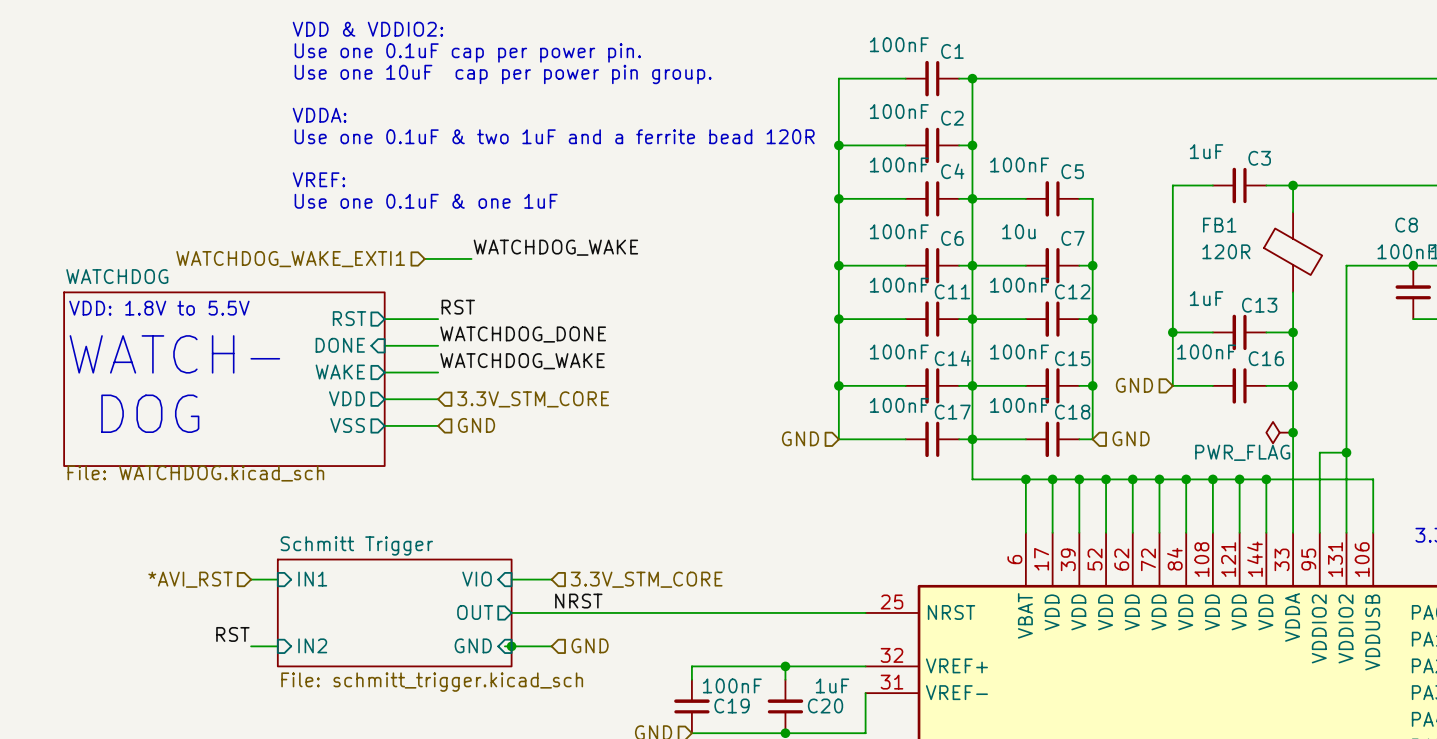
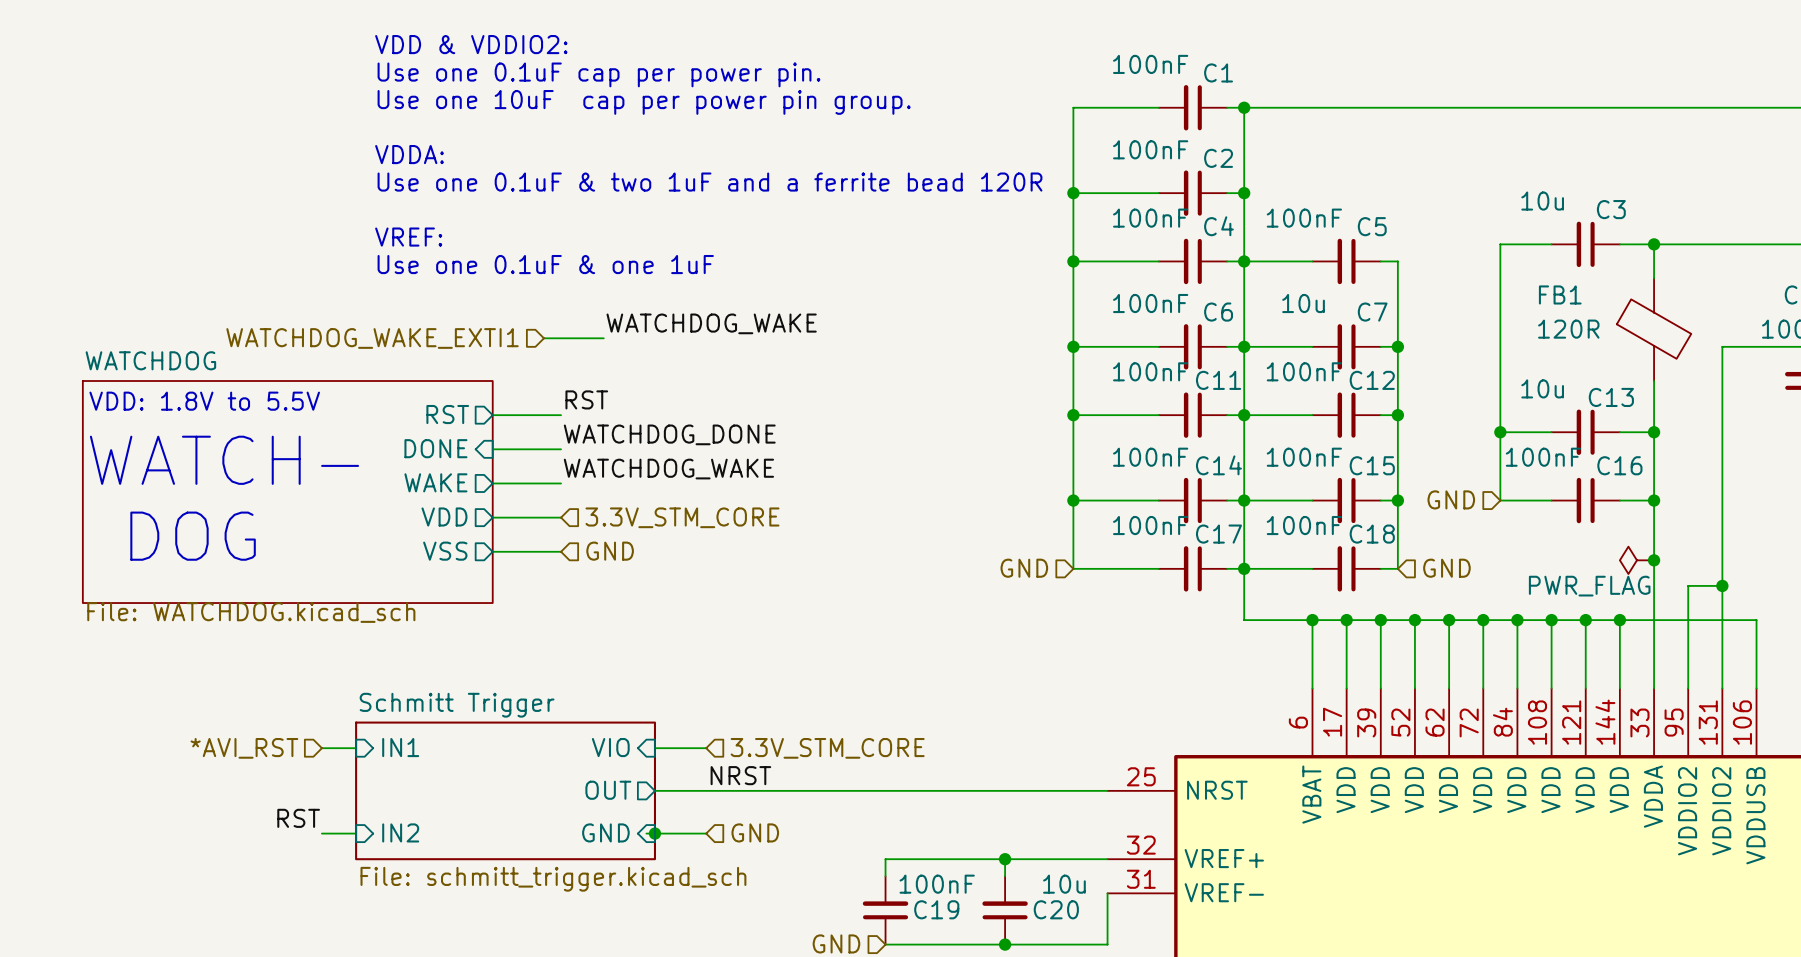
C3 value: 1uF (1206, 151) -> 10u (1542, 201)
C13 value: 1uF (1206, 298) -> 10u (1542, 388)
C20 value: 1uF (832, 685) -> 10u (1064, 884)

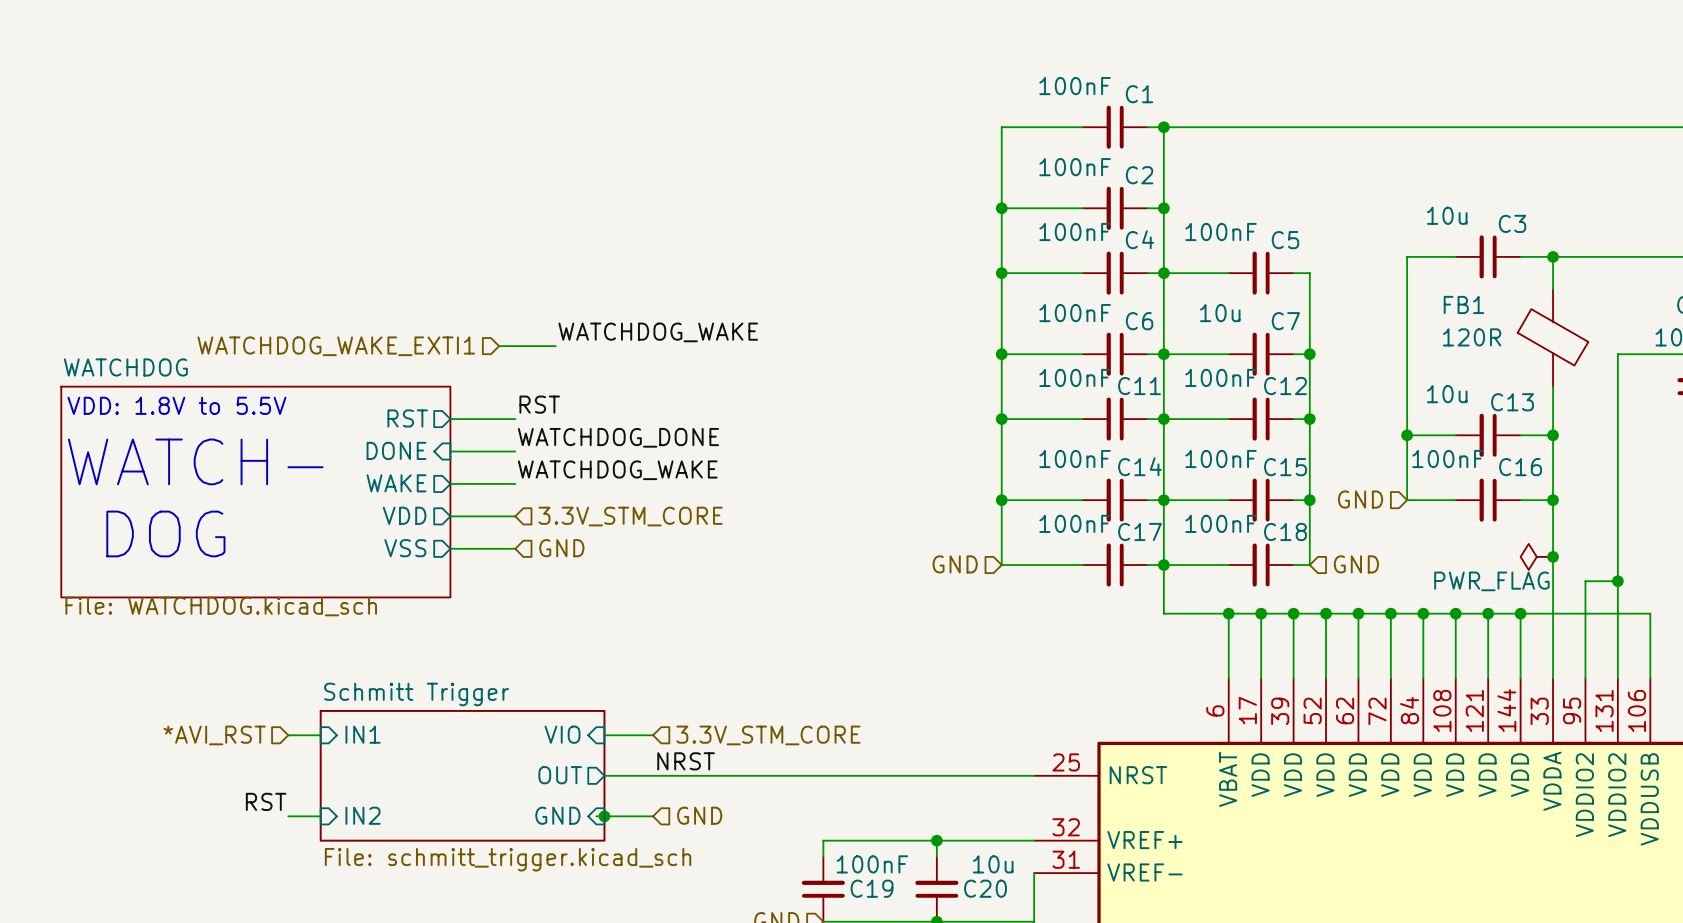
text: VDD & VDDIO2: (471, 44) -> none
text: Use one 0.1uF cap per power pin. (598, 74) -> none
text: Use one 10uF cap per power pin group. (644, 102) -> none
text: VDDA: (409, 154) -> none
text: Use one 0.1uF & two 1uF and a ferrite bead 120R (710, 182) -> none
text: VREF: (408, 237) -> none
text: Use one 0.1uF & one 1uF (545, 264) -> none

